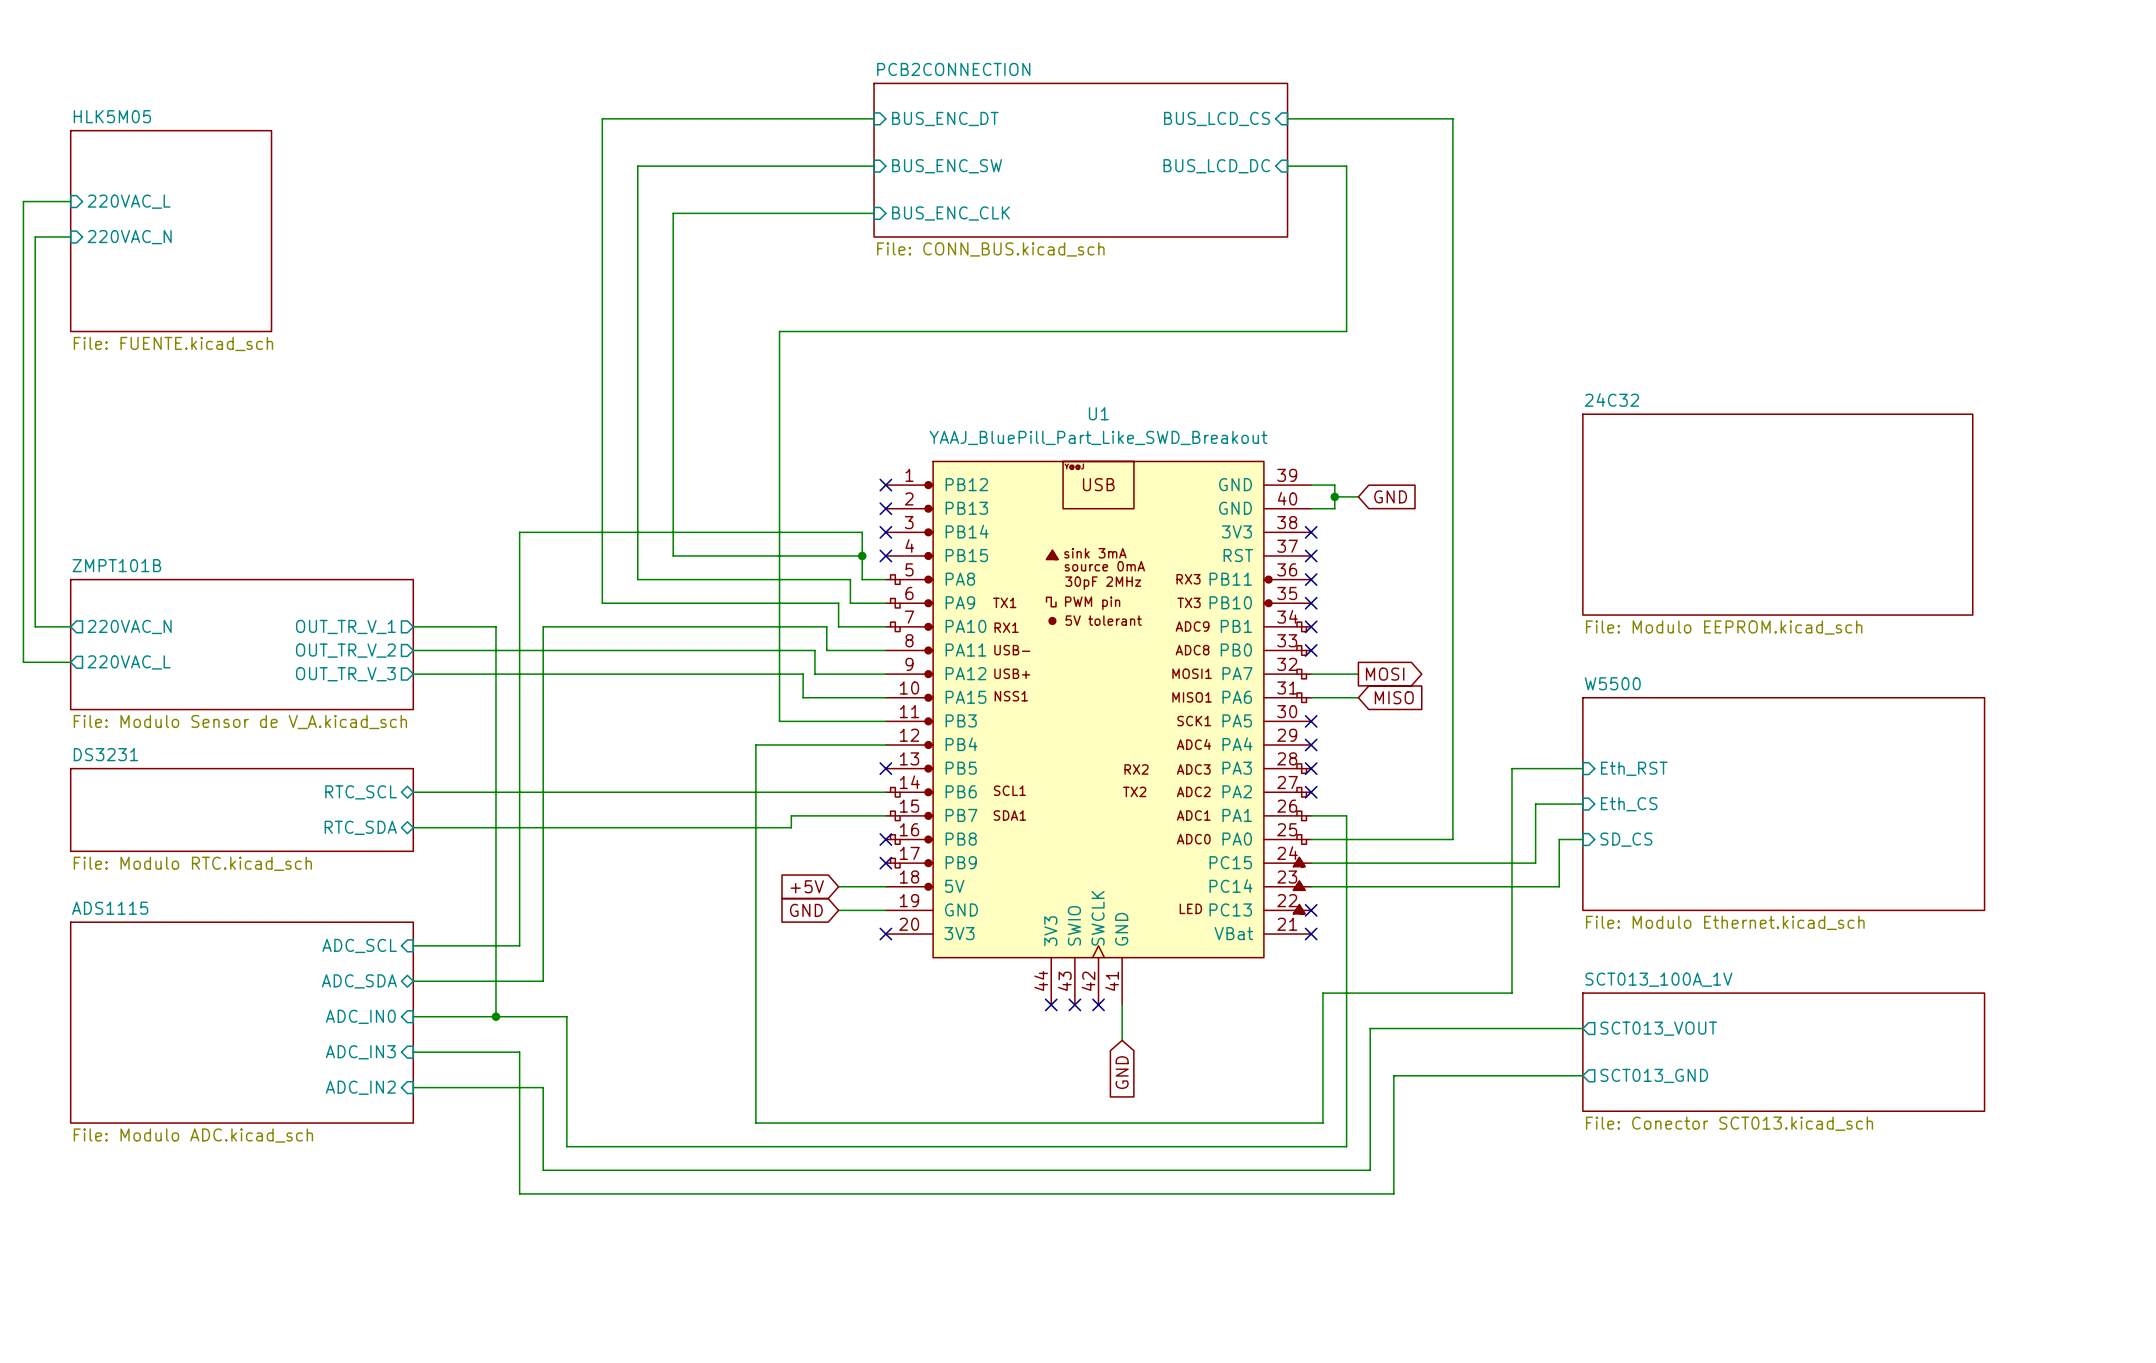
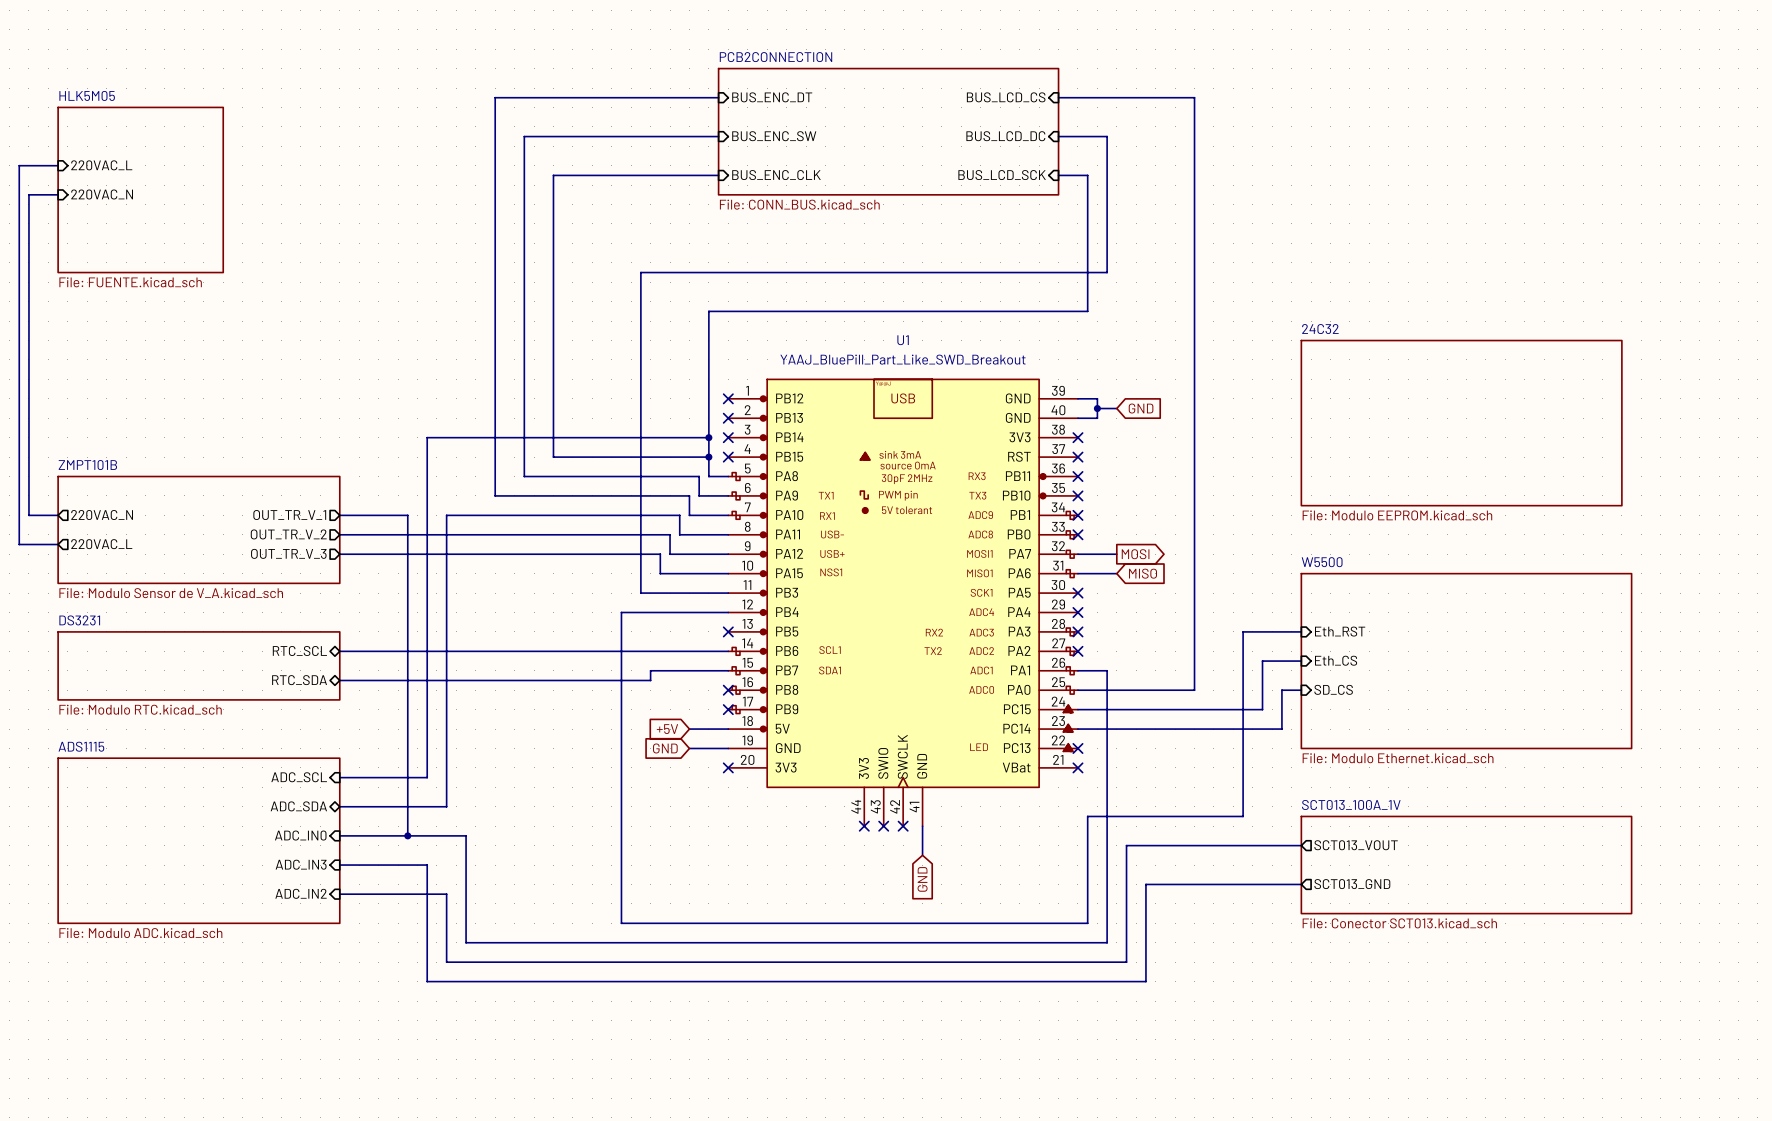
sheet pin: none -> BUS_LCD_SCK (1002, 175)
wire: none -> (1058, 175) (1087, 175) (1087, 311) (708, 311) (708, 437)
junction: none -> (708, 437)

